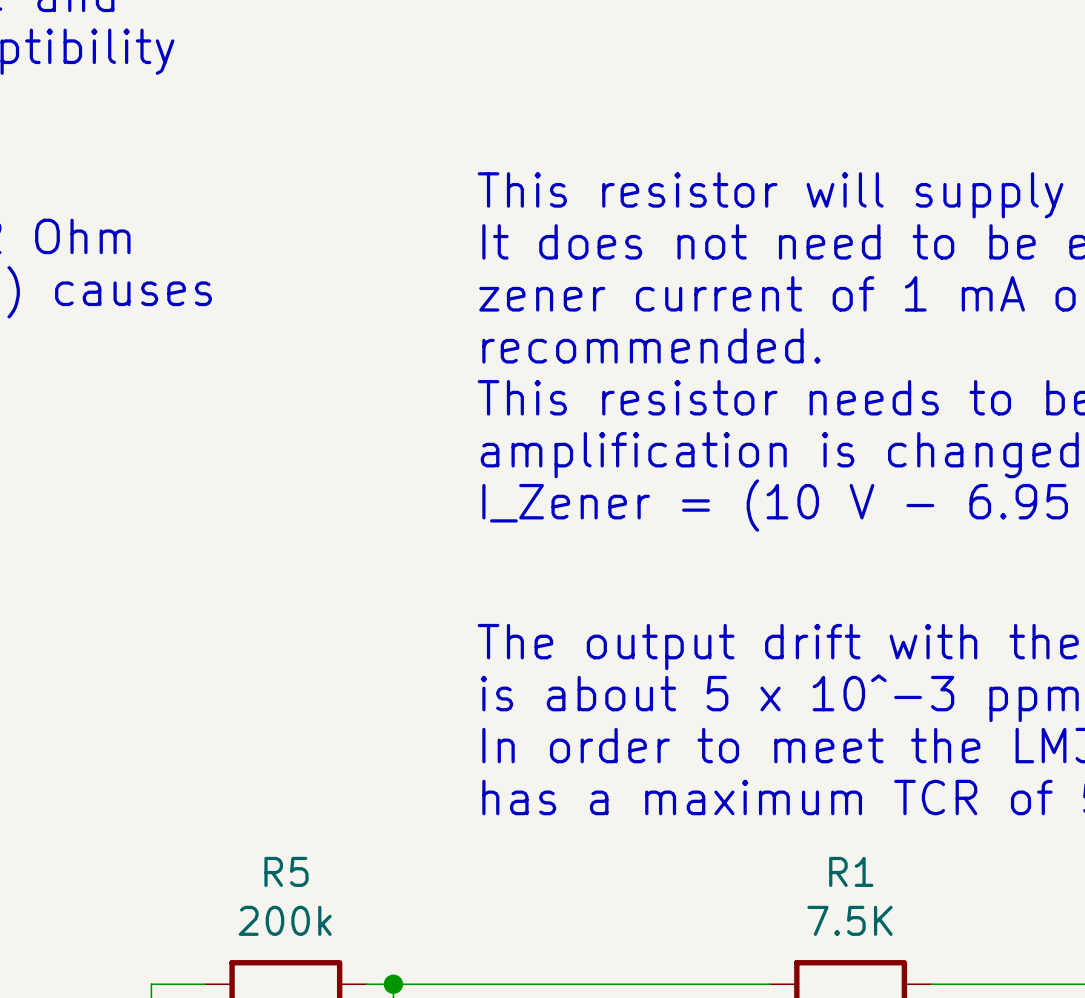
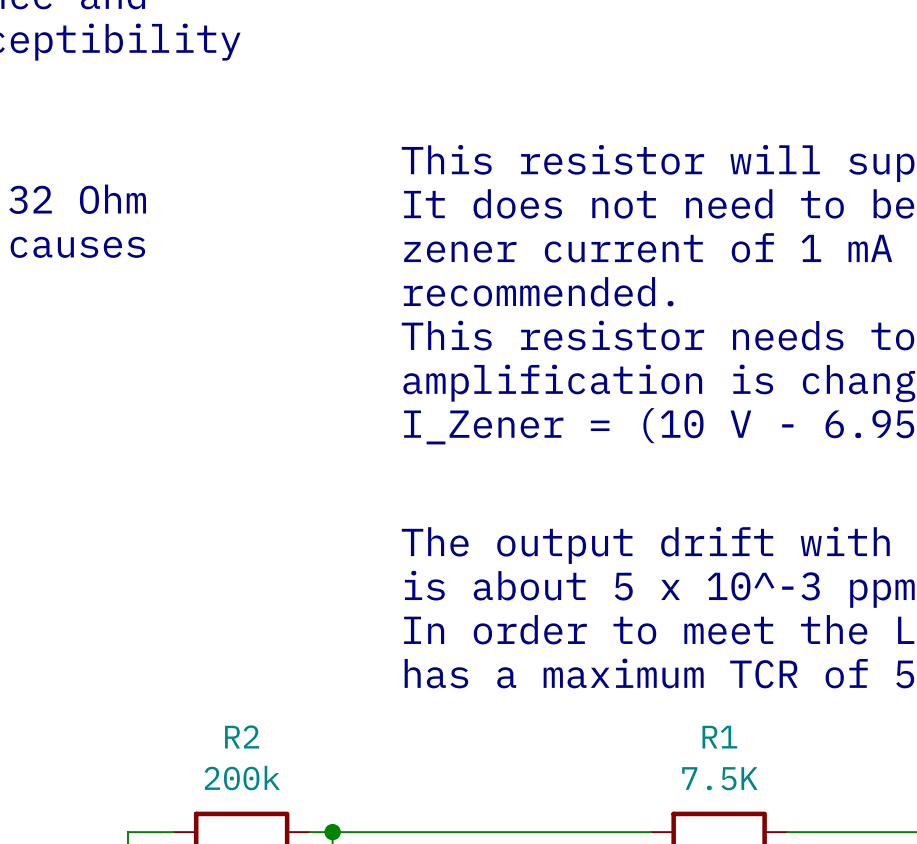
R5 name: R5 (286, 871) -> R2 (242, 736)

